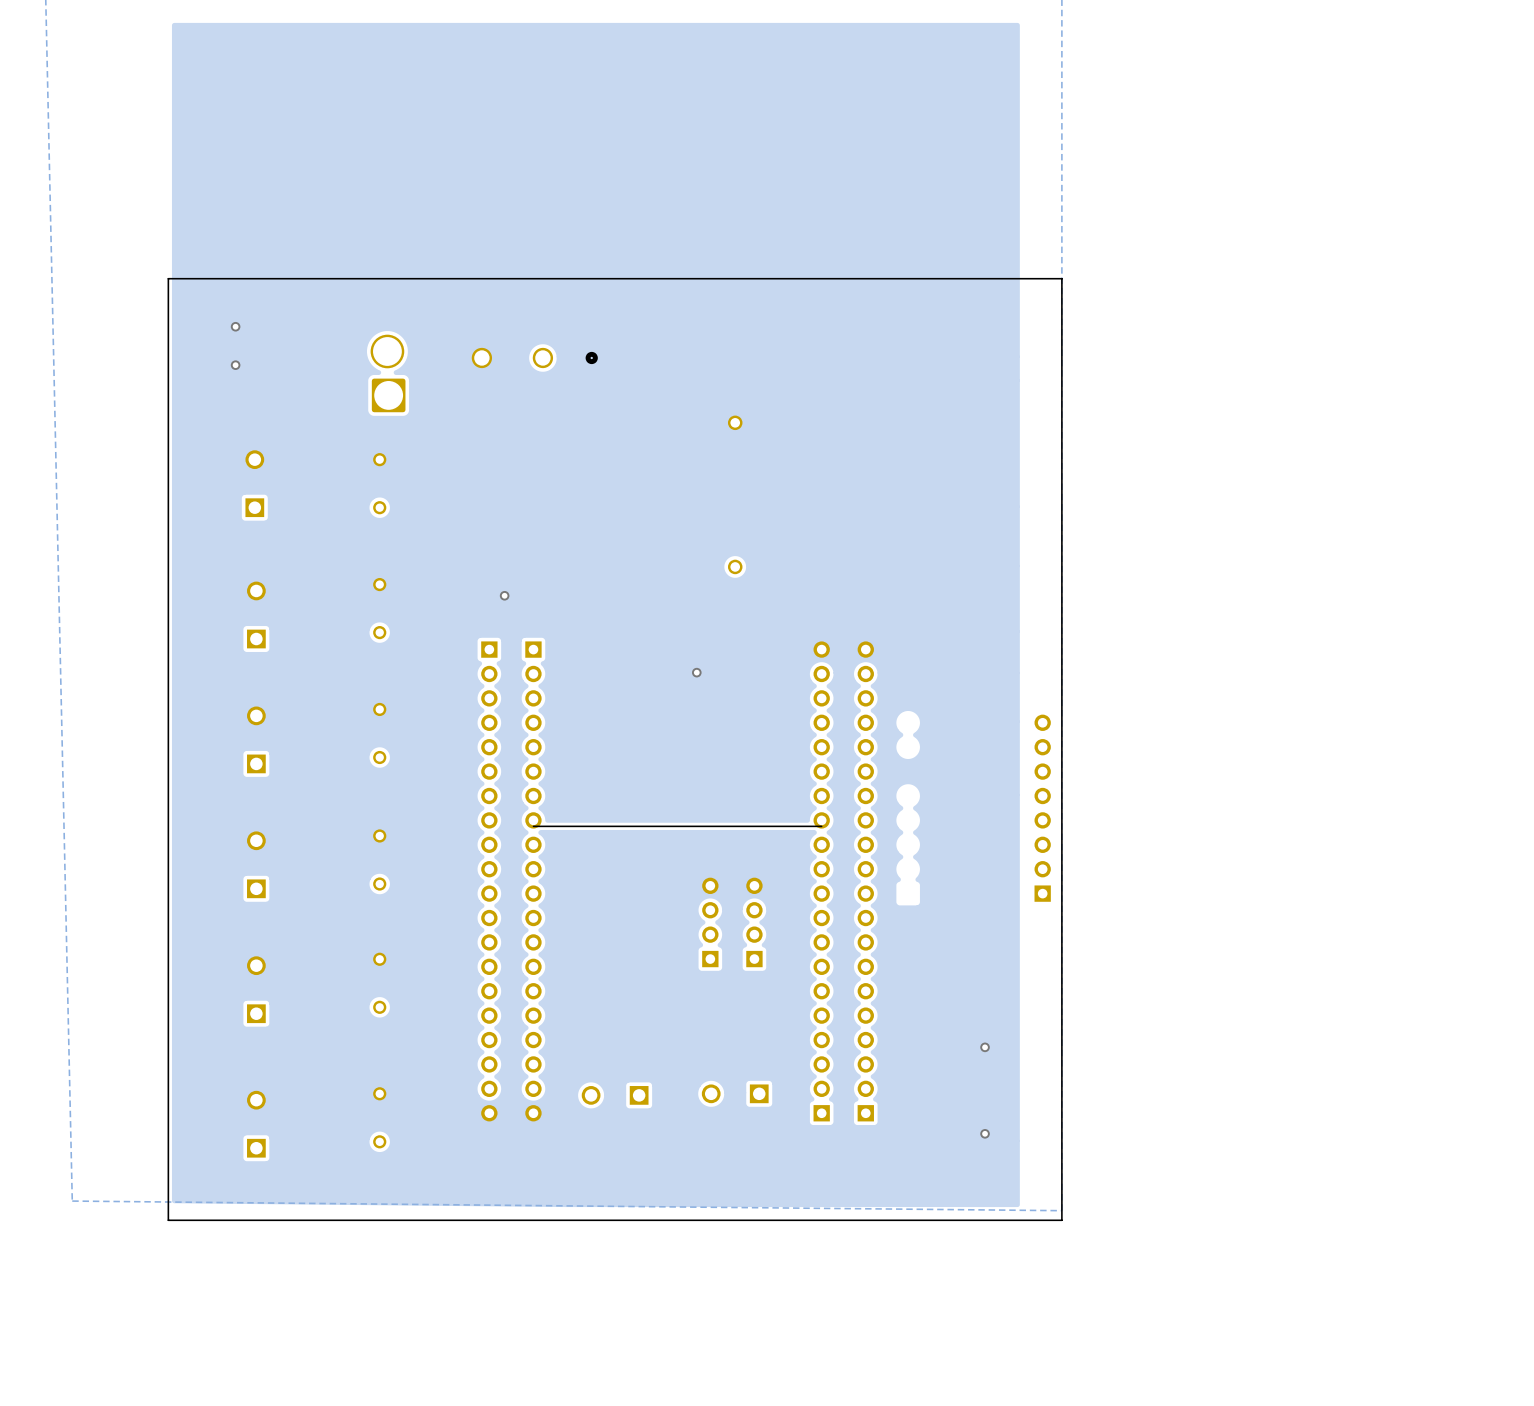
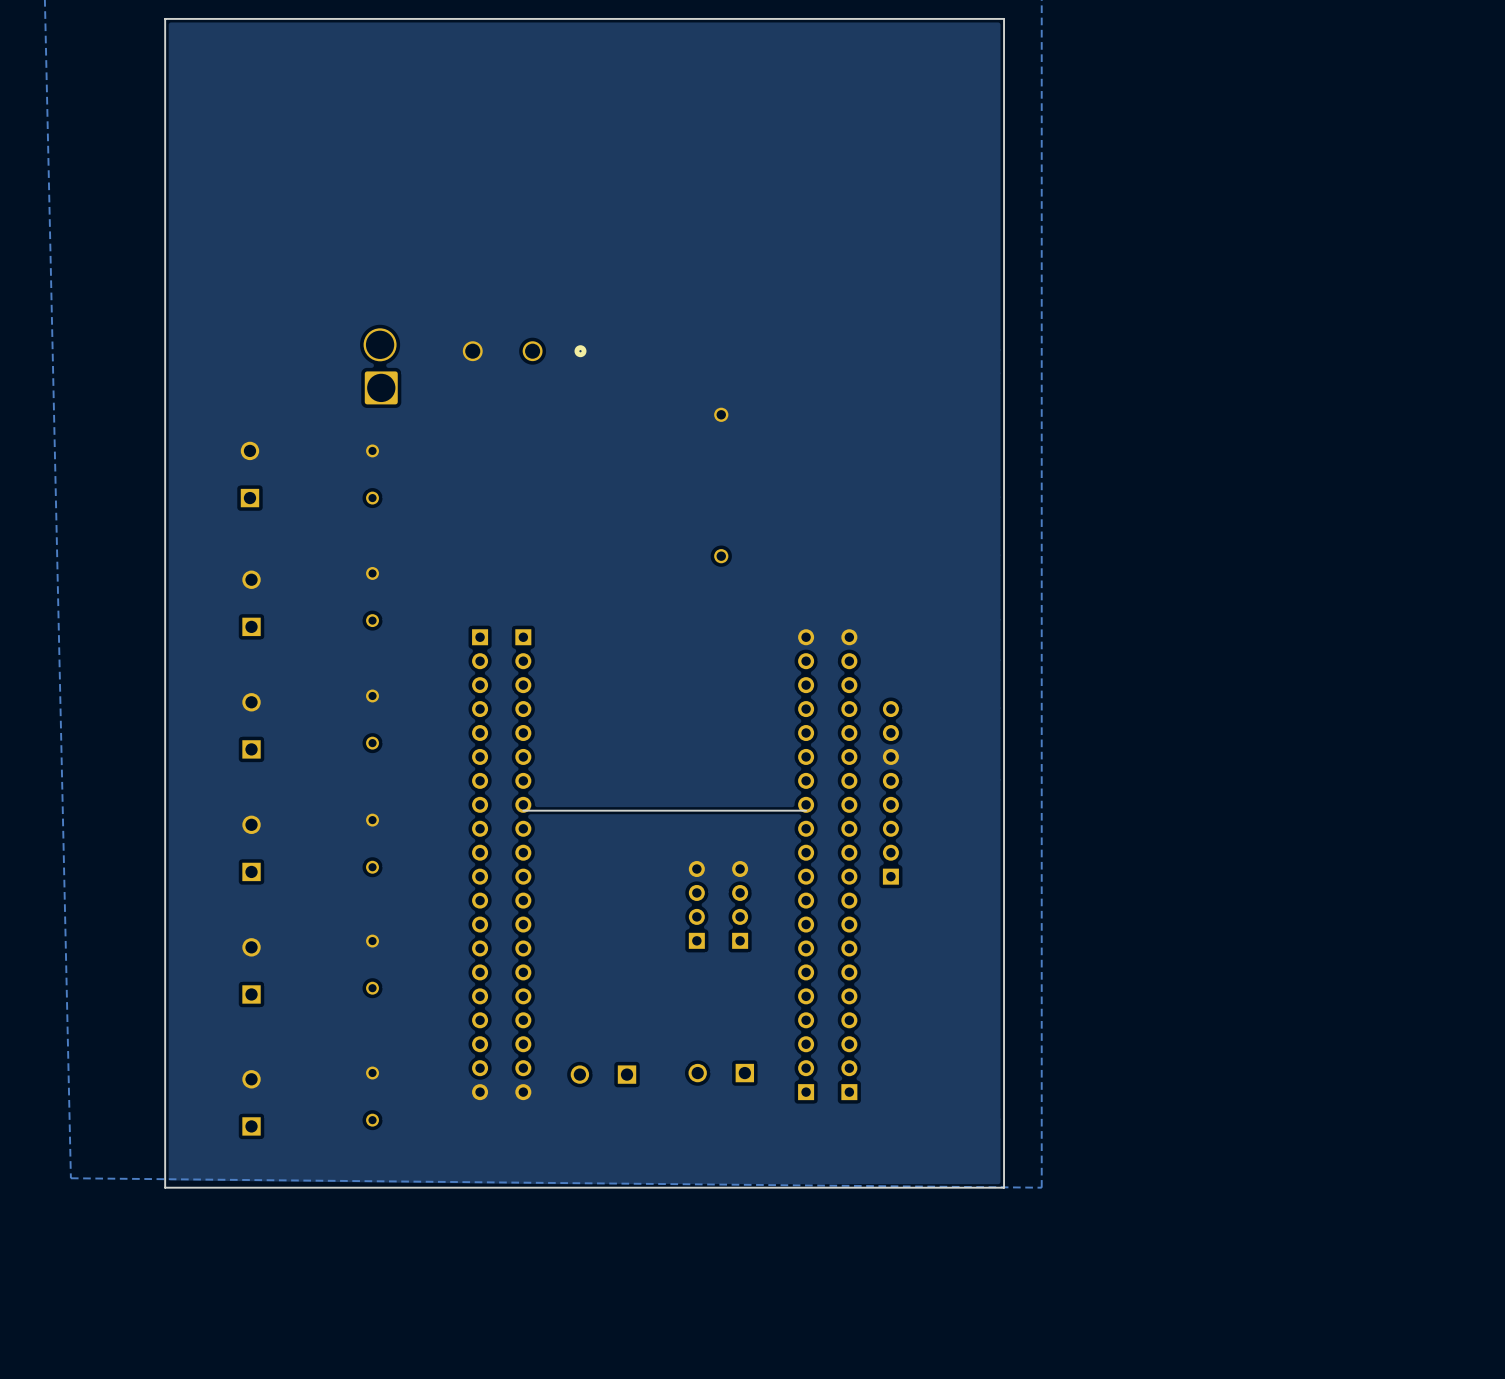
board edge: (168, 278) (1061, 278) (1061, 1220) (168, 1220) (168, 1210) -> (165, 273) (165, 18) (1004, 18) (1004, 1187) (165, 1187)
via: (235, 326) -> none
via: (235, 365) -> none
via: (504, 595) -> none
via: (696, 672) -> none
part position: (1042, 808) -> (890, 792)
via: (985, 1047) -> none
via: (985, 1133) -> none

